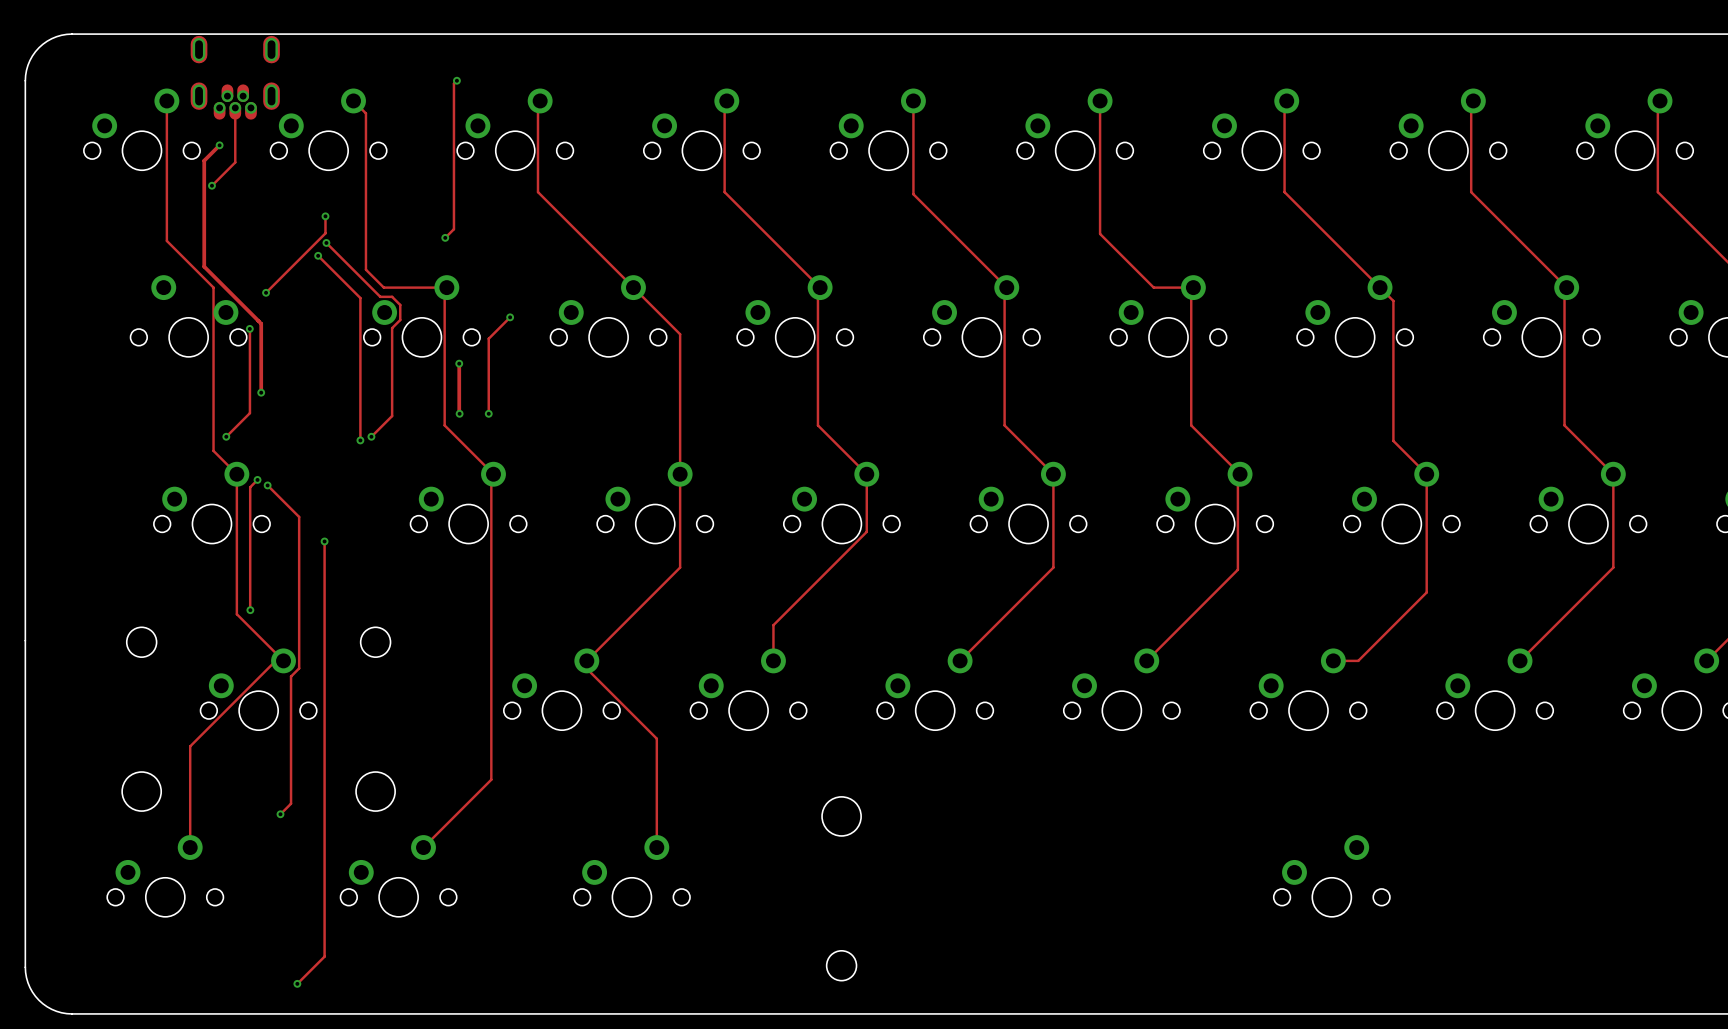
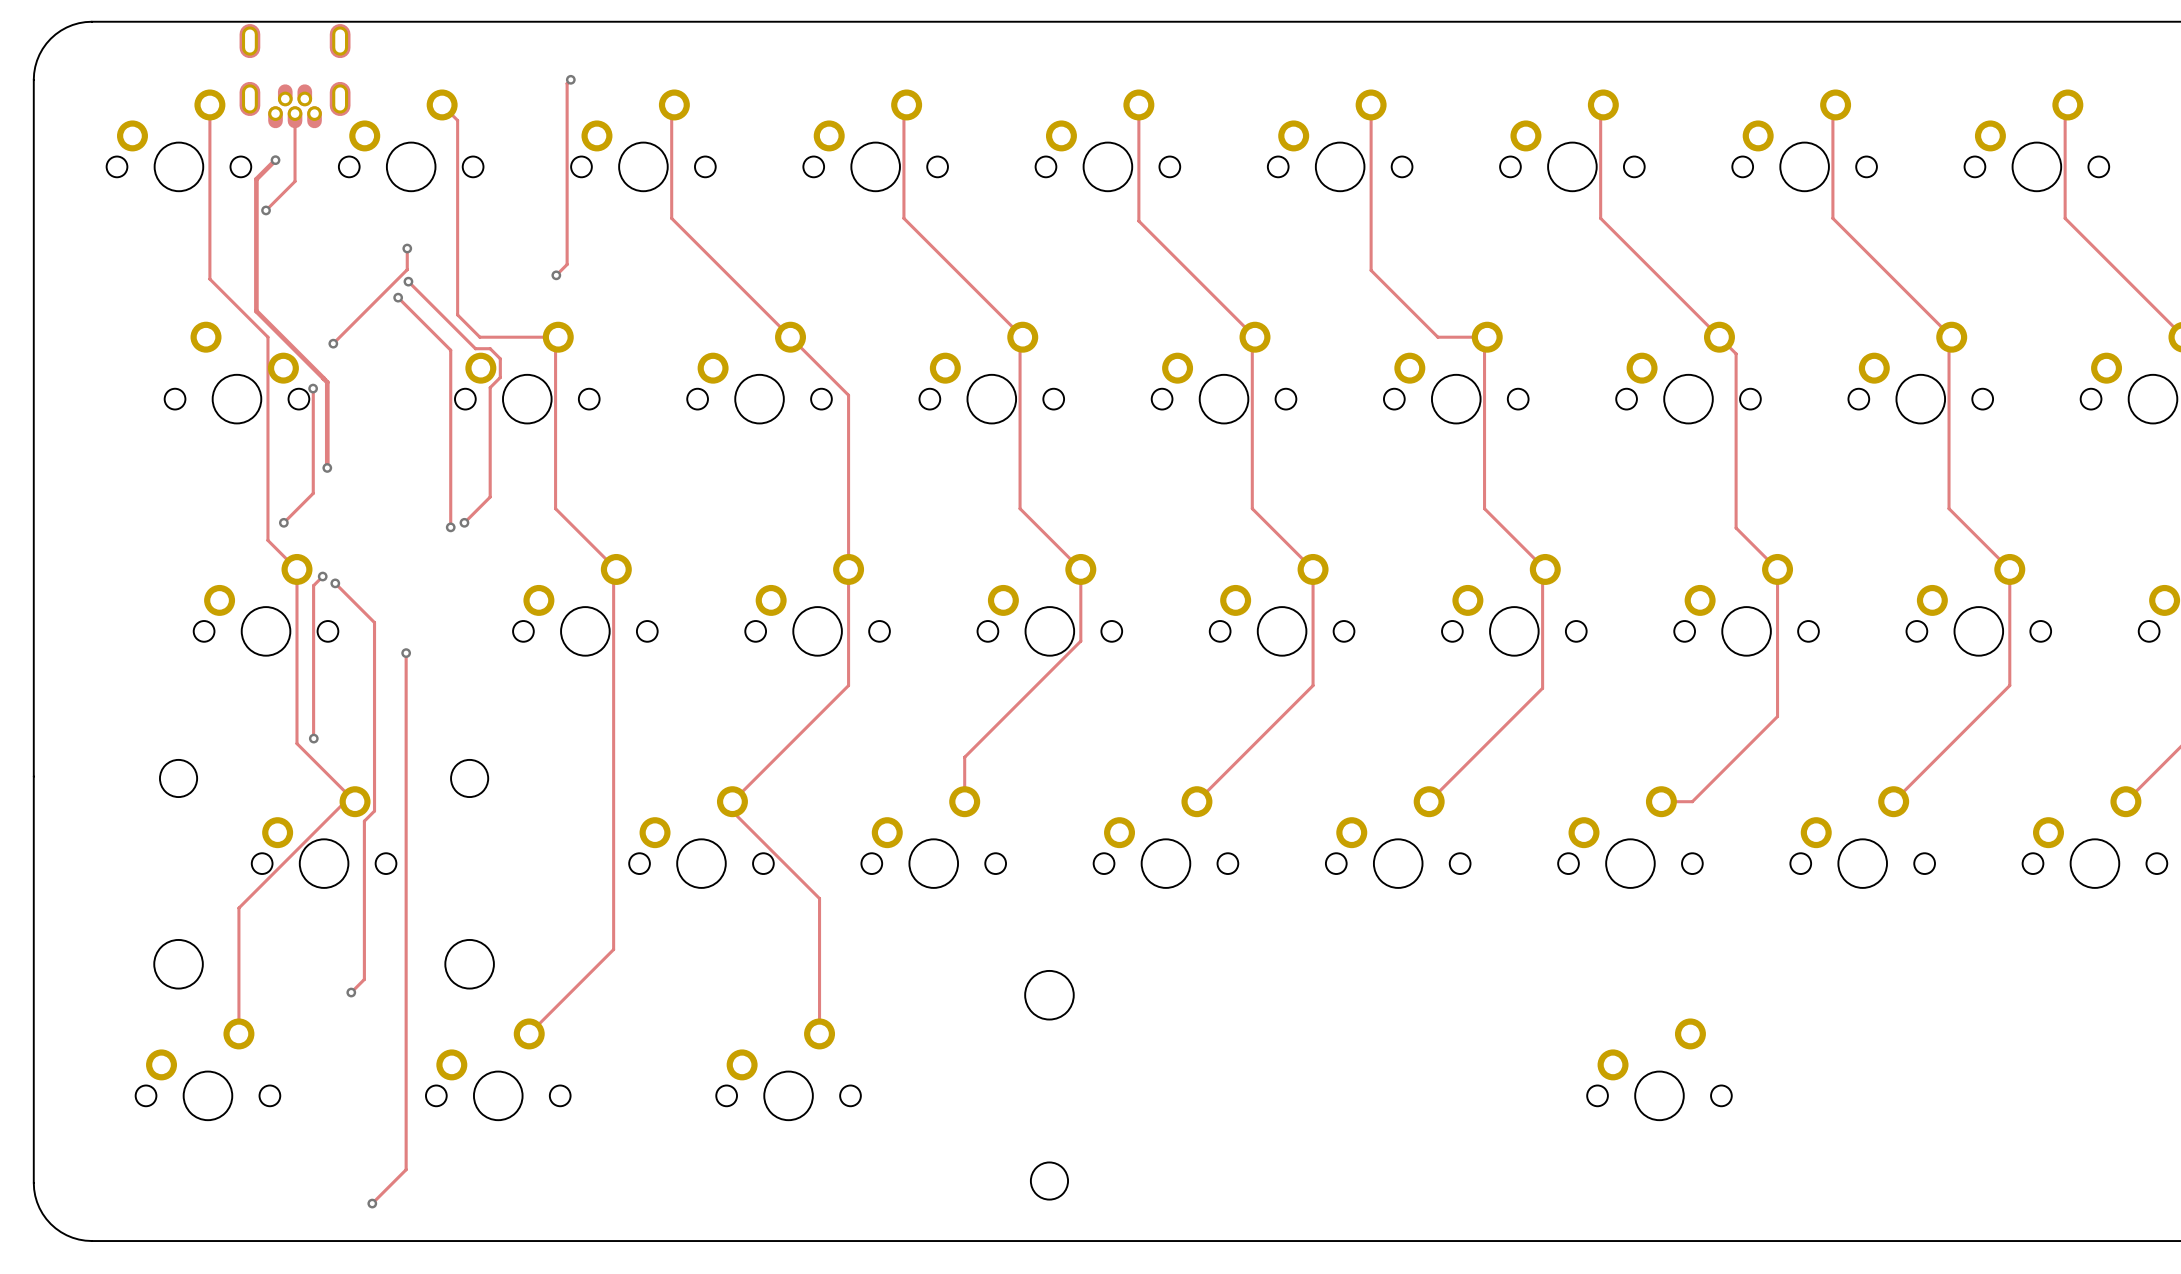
track: (510, 317) (488, 338) (488, 413) -> none
via: (510, 317) -> none
track: (459, 363) (459, 413) -> none
via: (459, 363) -> none
via: (459, 413) -> none
via: (488, 413) -> none

